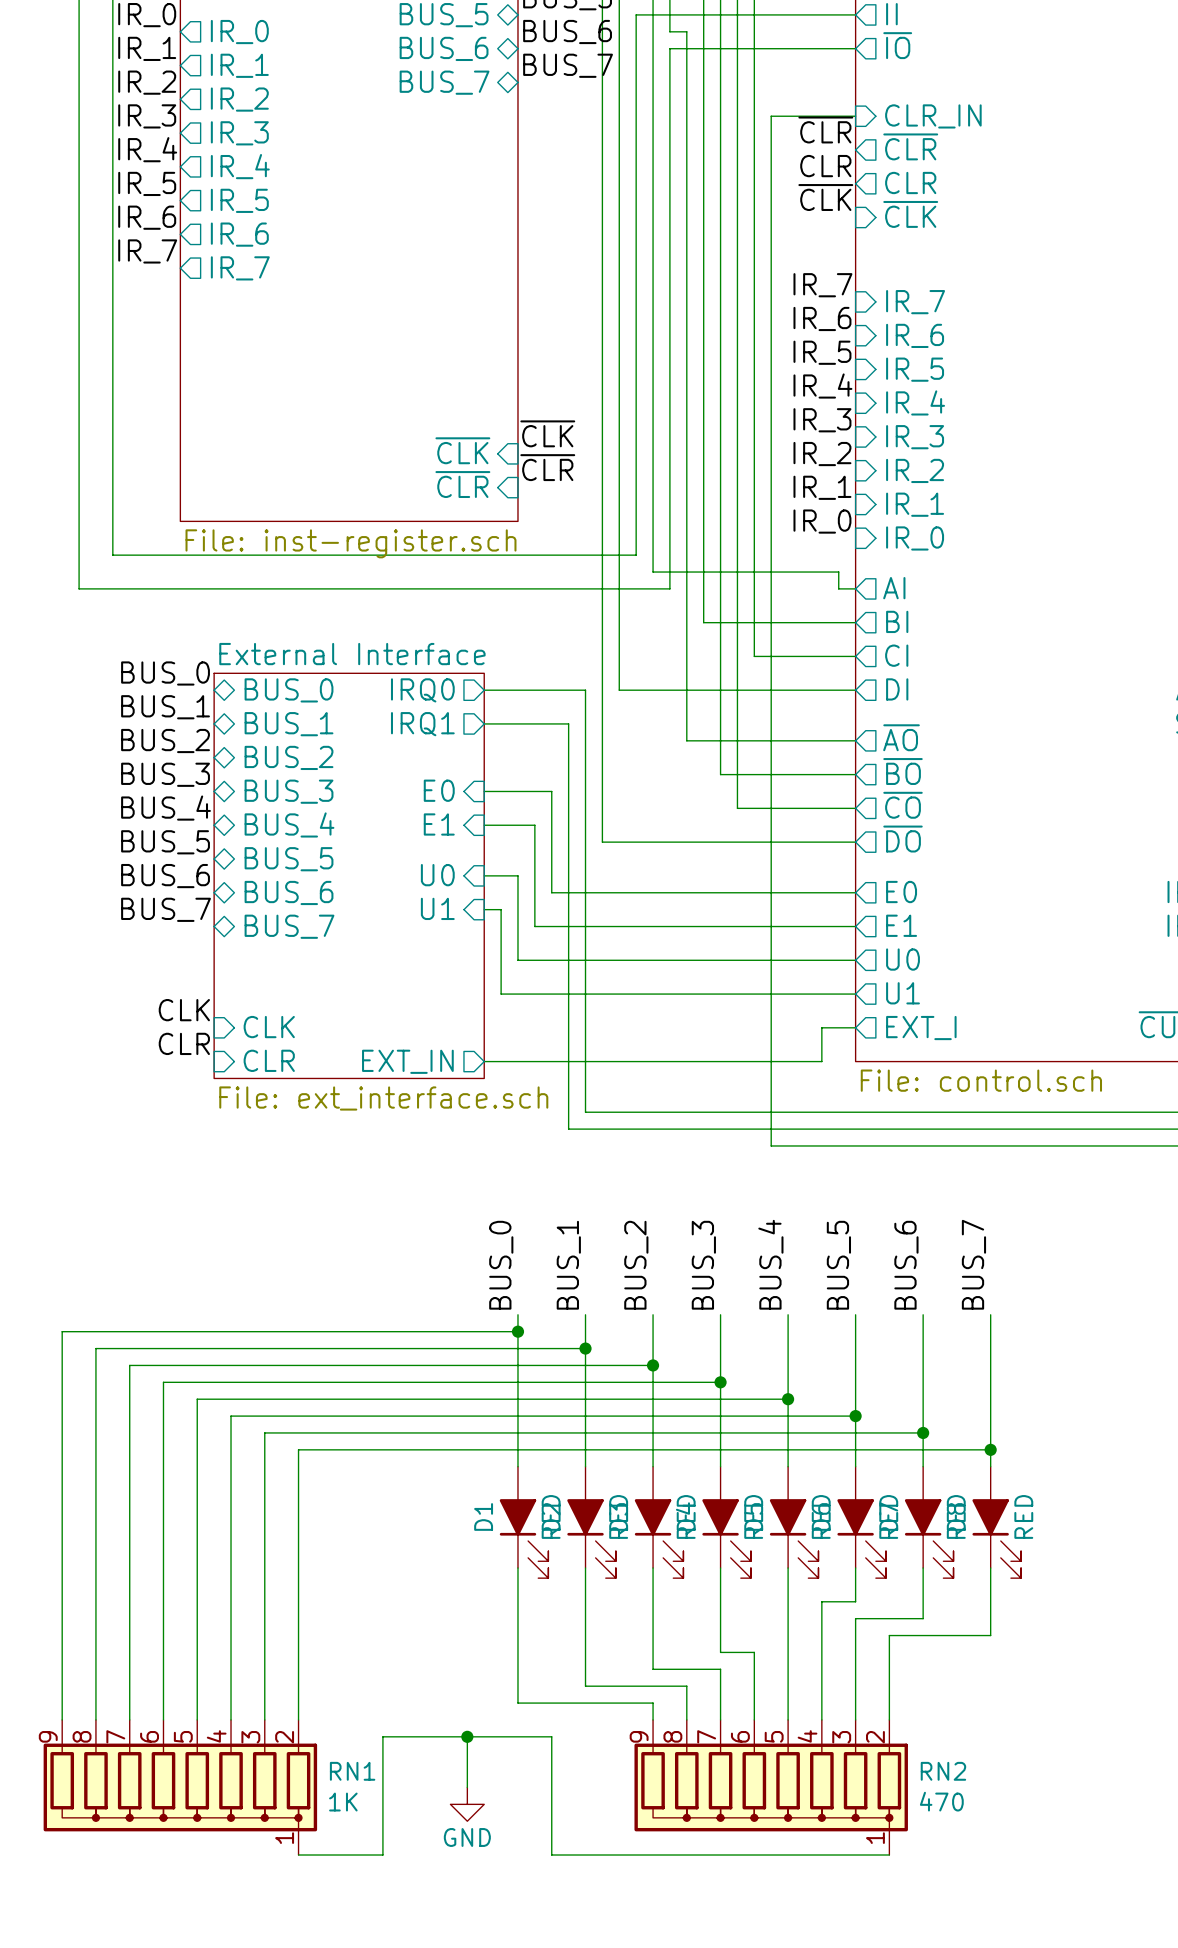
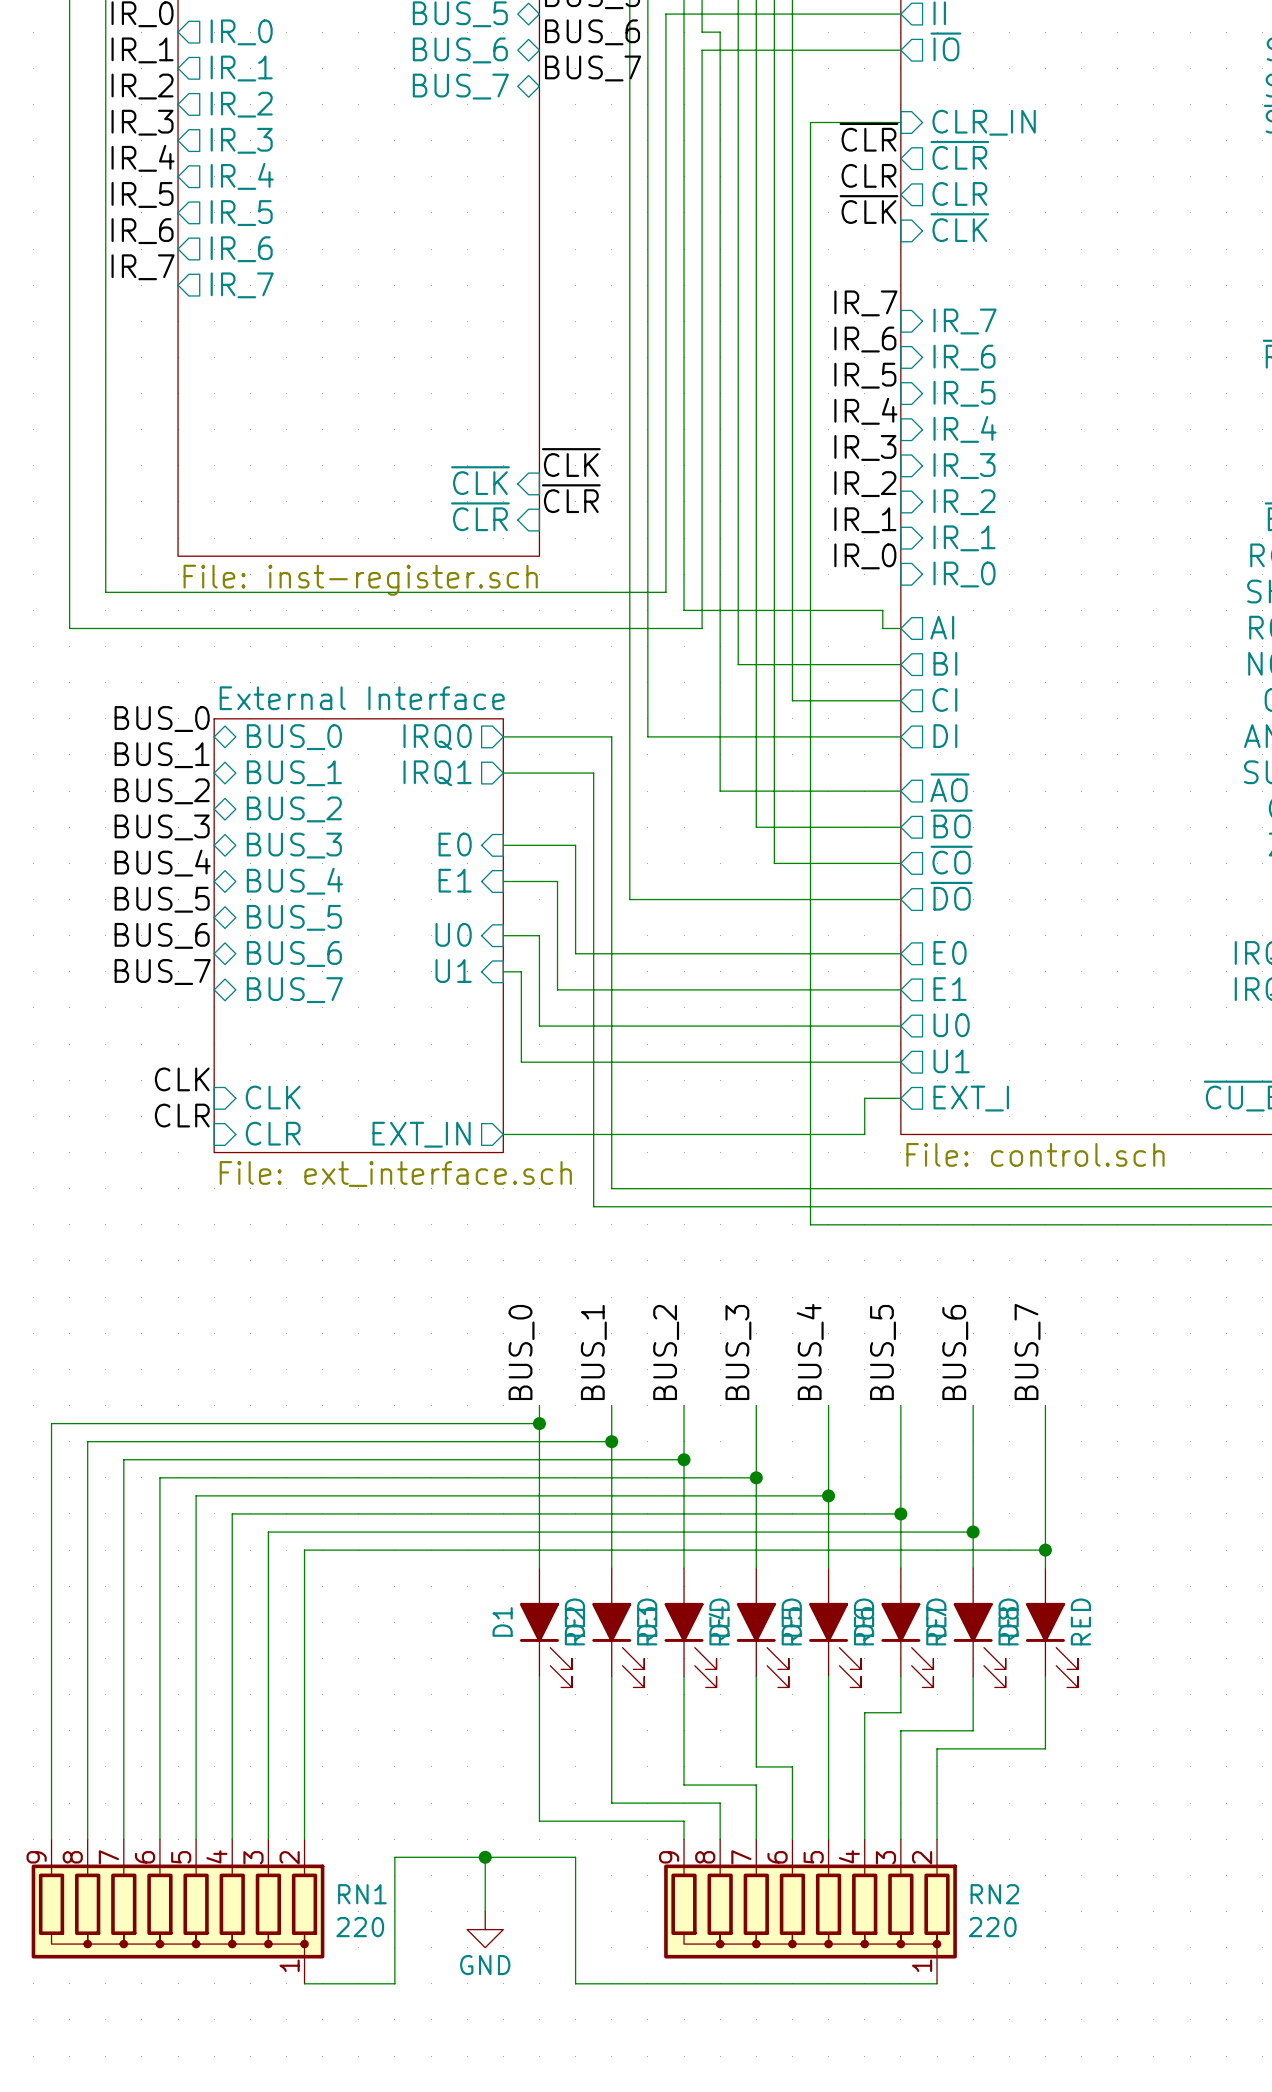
RN2 value: 470 (941, 1801) -> 220 (992, 1927)
RN1 value: 1K (343, 1802) -> 220 (360, 1927)

